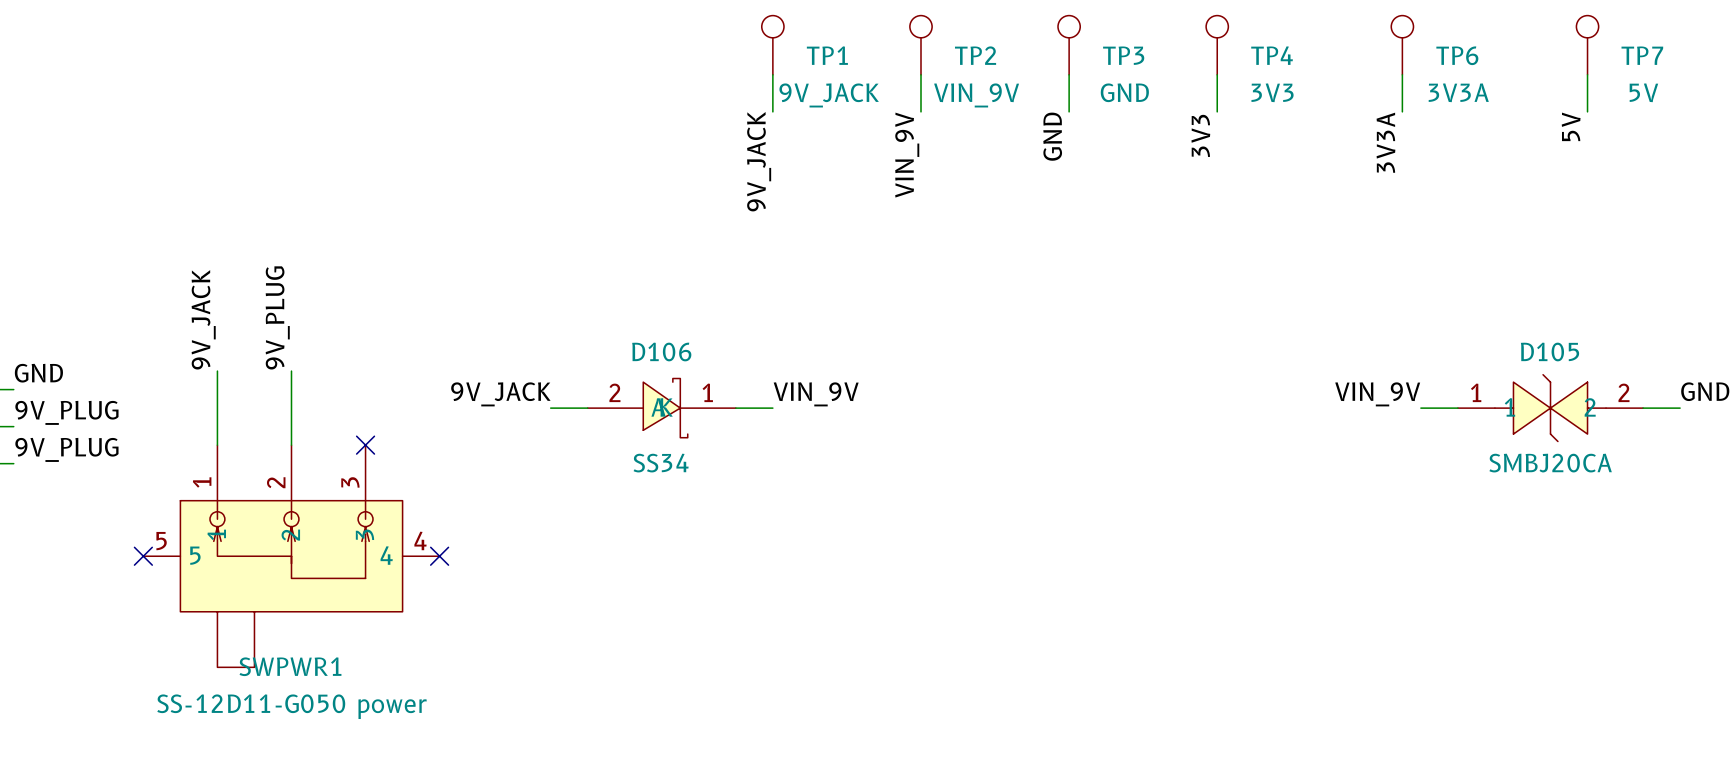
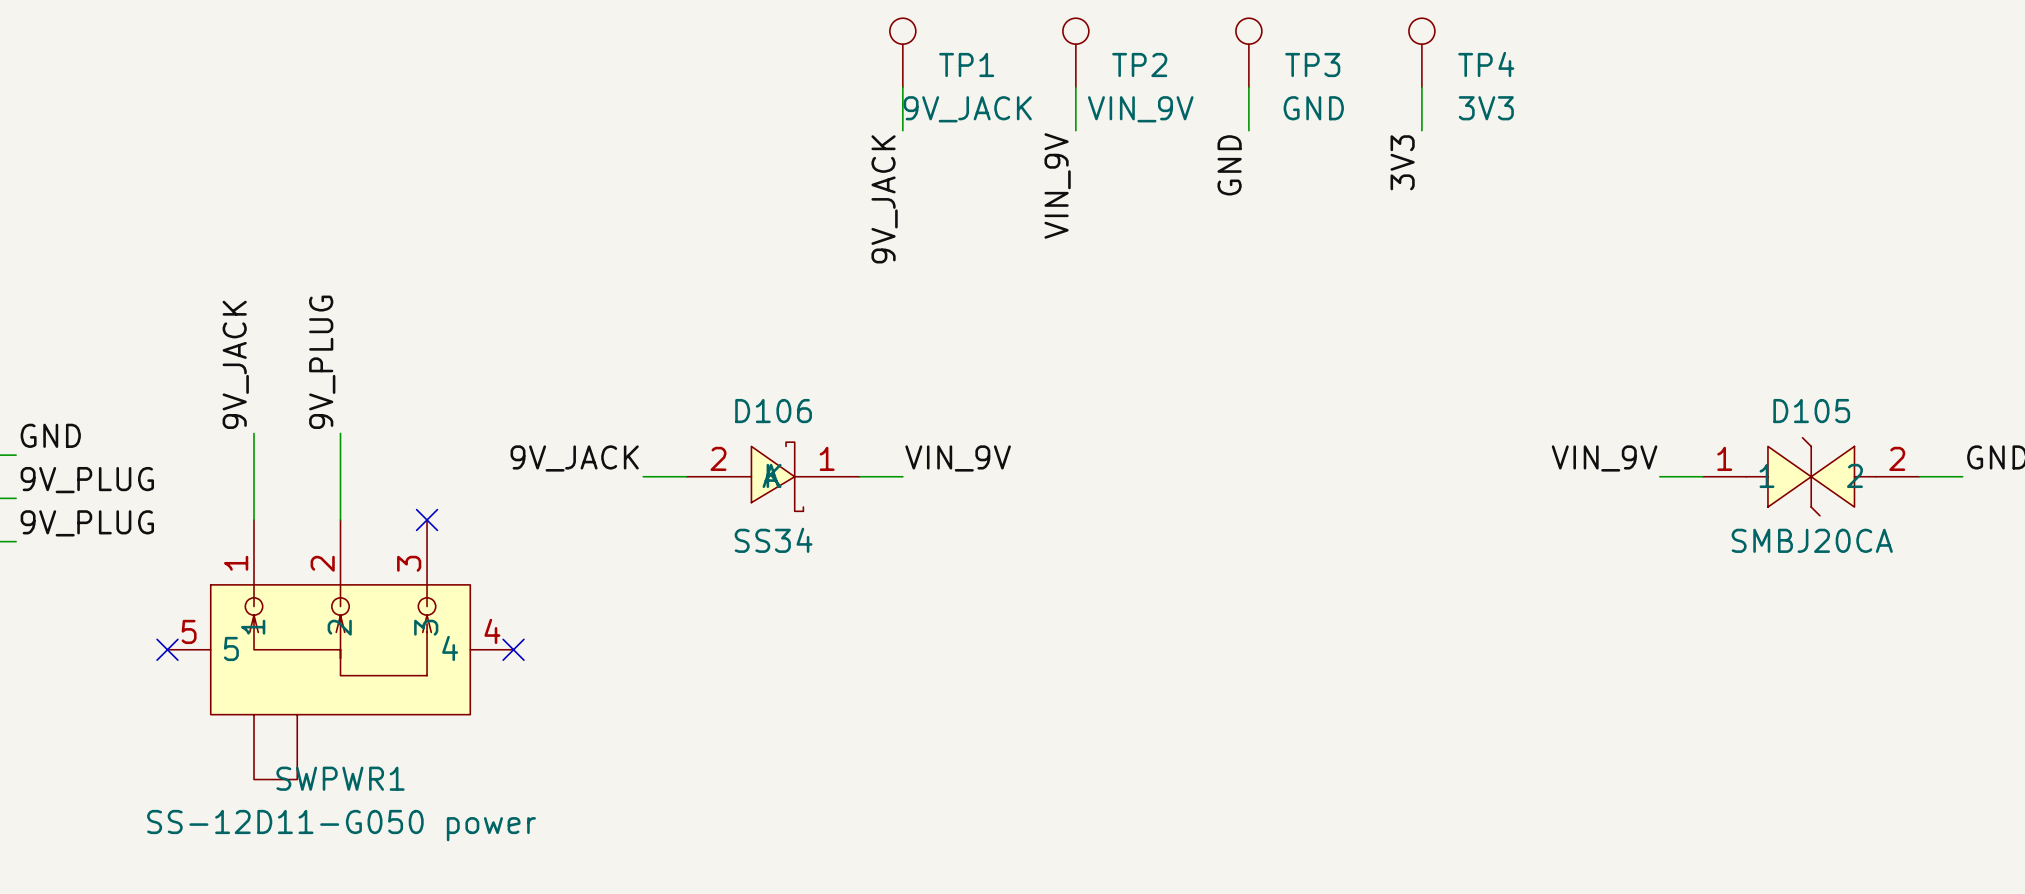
TP6: 3V3A (1402, 45) -> none
TP7: 5V (1587, 45) -> none
wire: (1402, 74) (1402, 111) -> none
wire: (1587, 74) (1587, 111) -> none
label: 5V (1571, 126) -> none
label: 3V3A (1385, 142) -> none

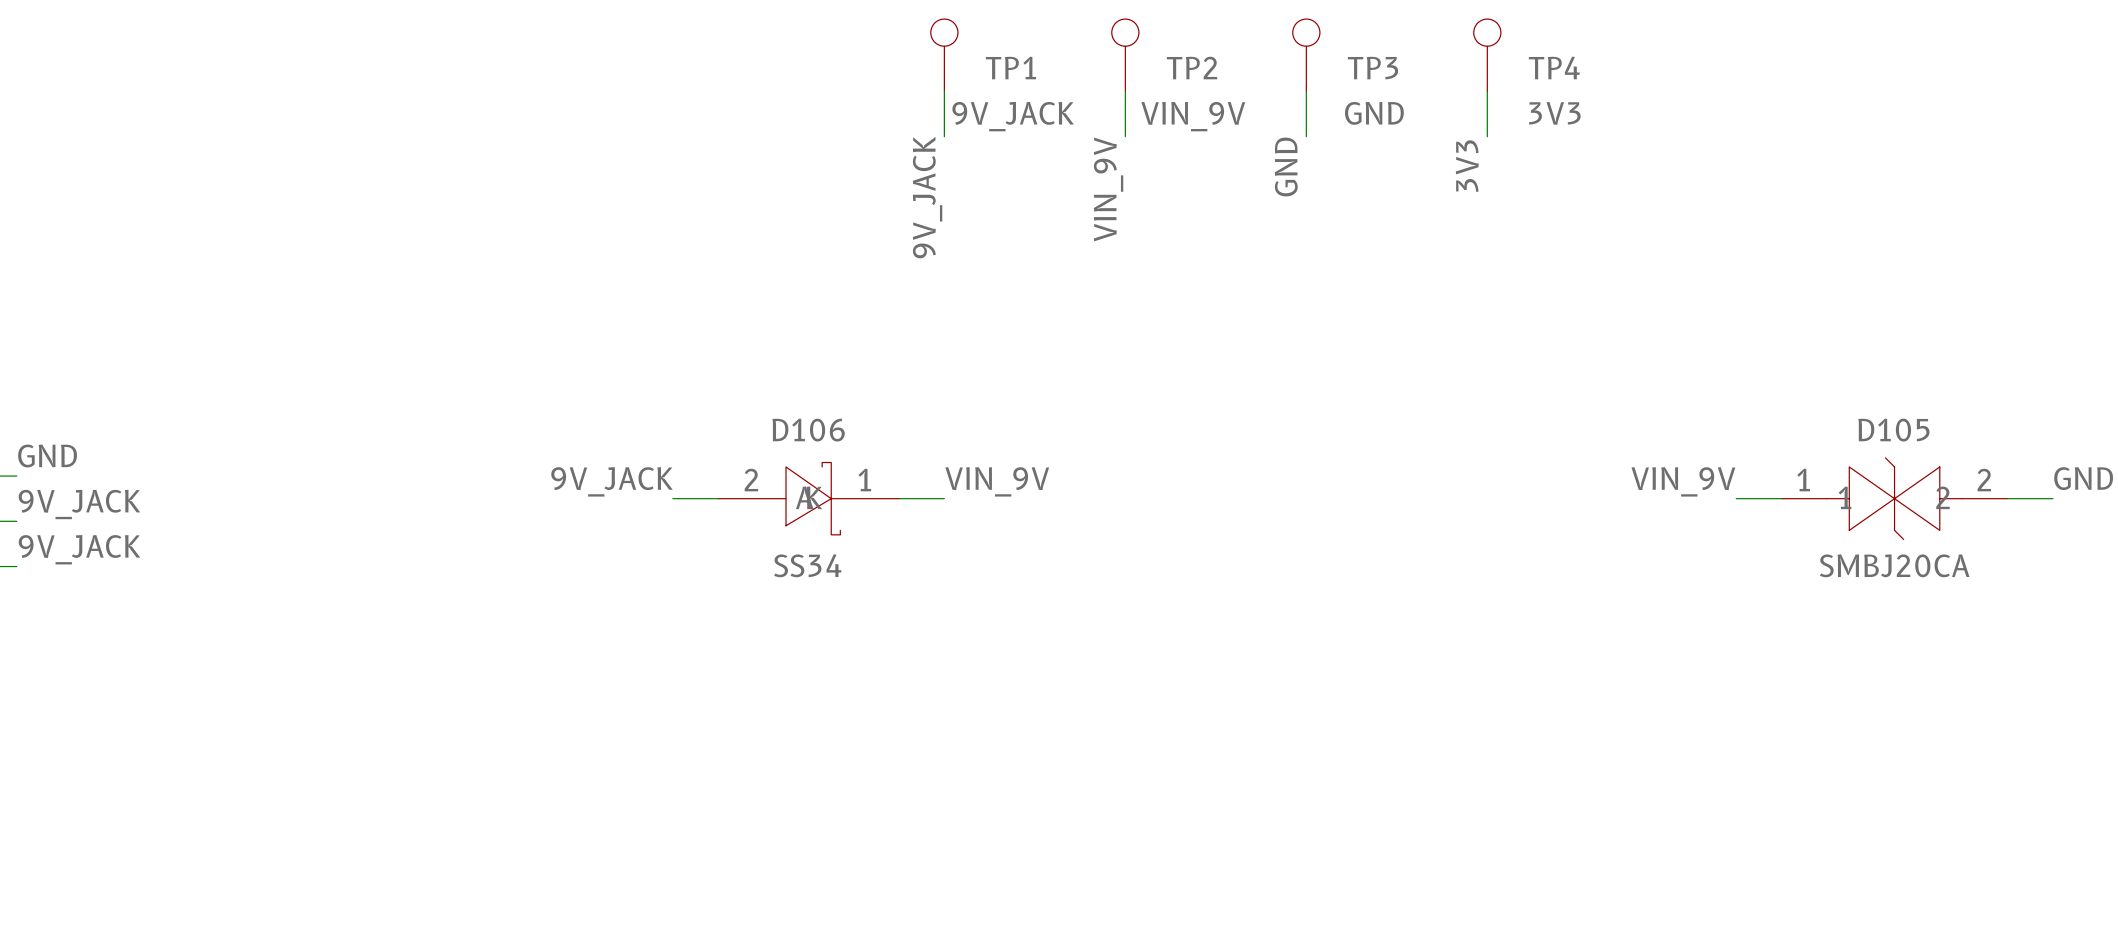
label: 9V_PLUG (322, 362) -> none
label: 9V_JACK (235, 364) -> none
wire: (253, 433) (253, 520) -> none
wire: (340, 433) (340, 520) -> none
label: 9V_PLUG (87, 480) -> 9V_JACK (79, 504)
no-connect mark: (427, 520) -> none
label: 9V_PLUG (87, 523) -> 9V_JACK (79, 549)
no-connect mark: (167, 649) -> none
SWPWR1: SS-12D11-G050 power (340, 649) -> none
no-connect mark: (513, 649) -> none

